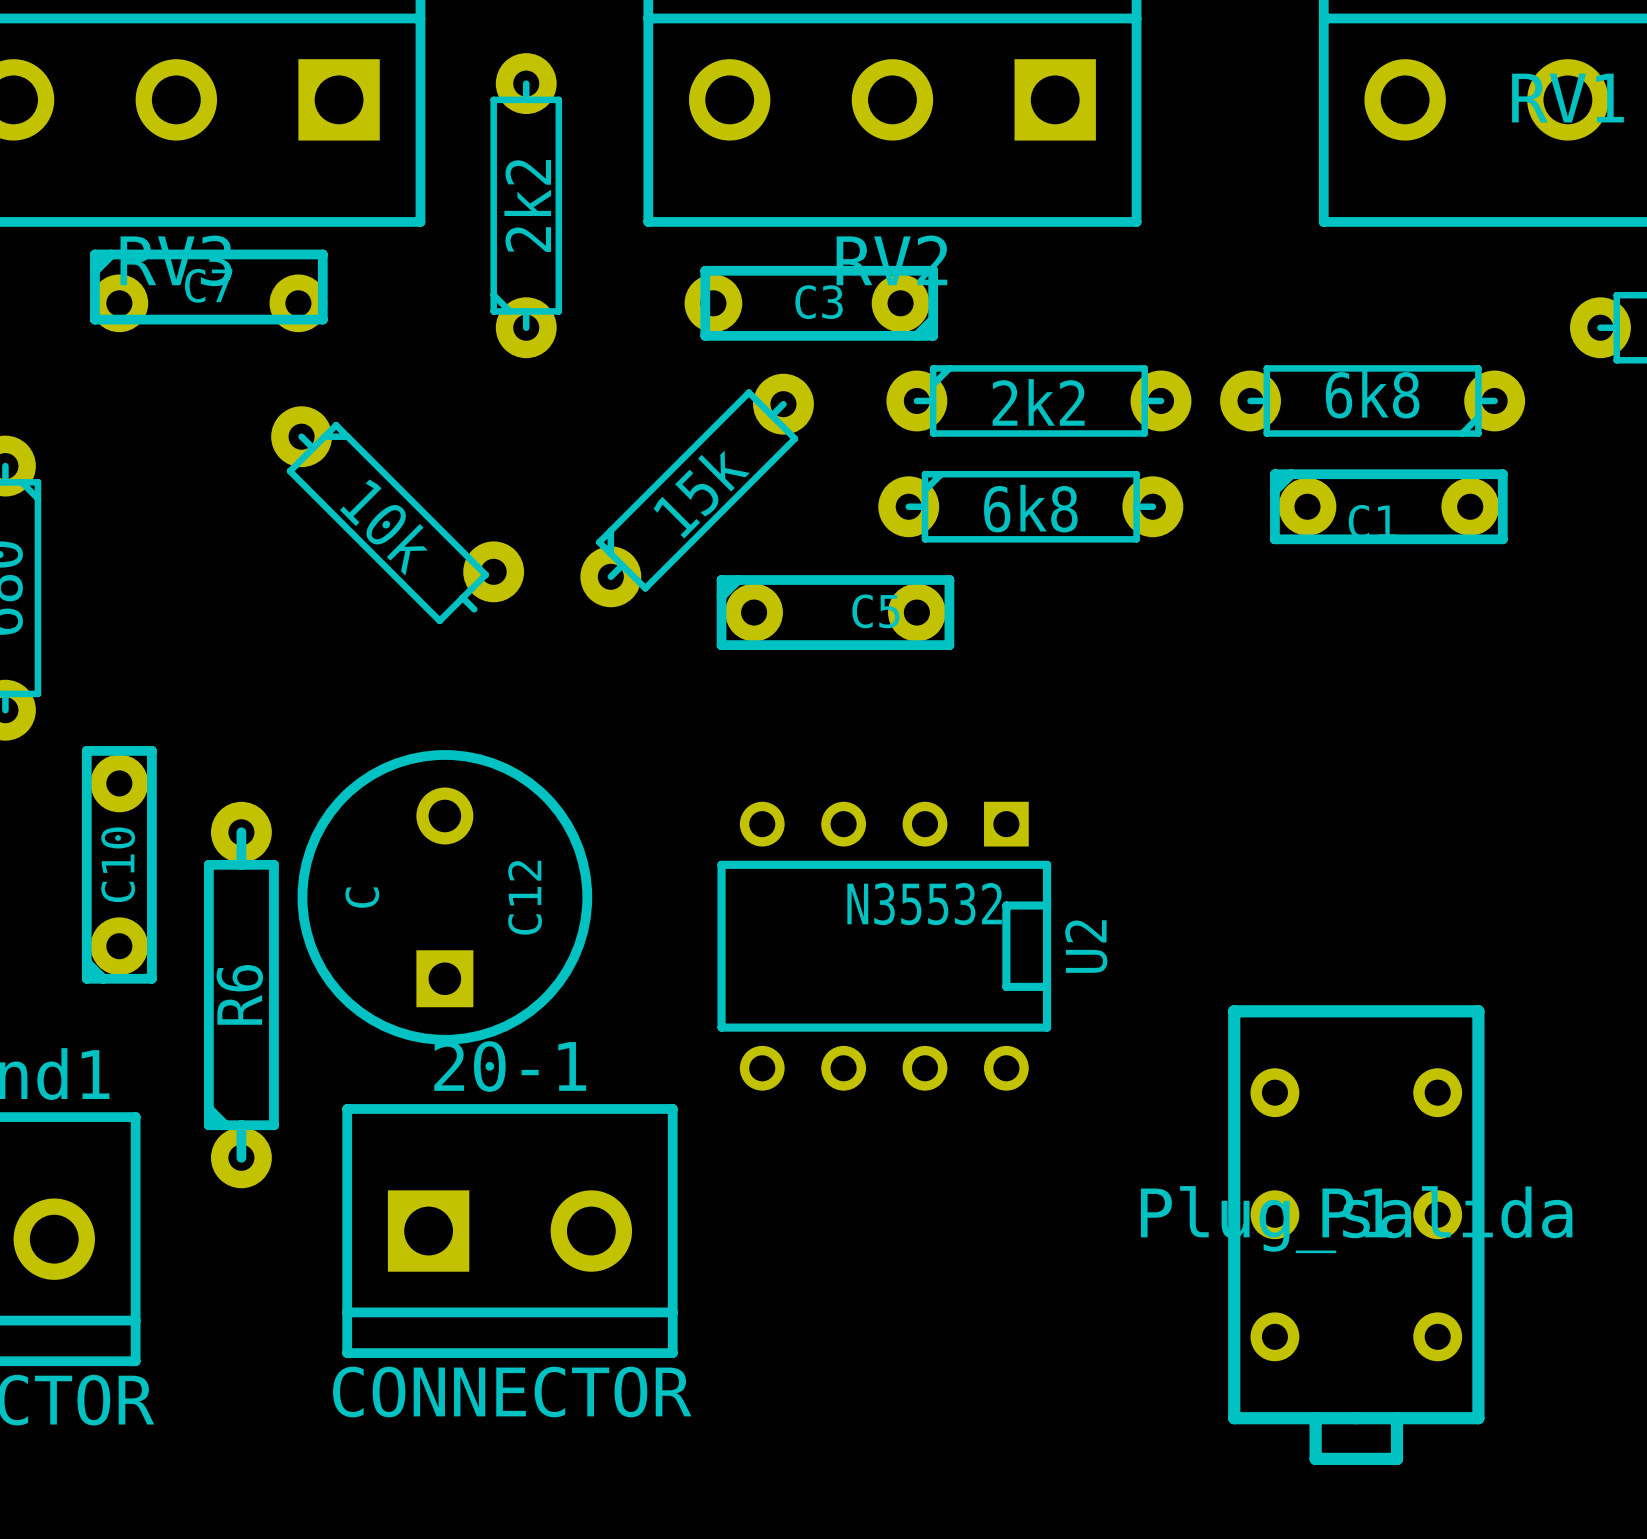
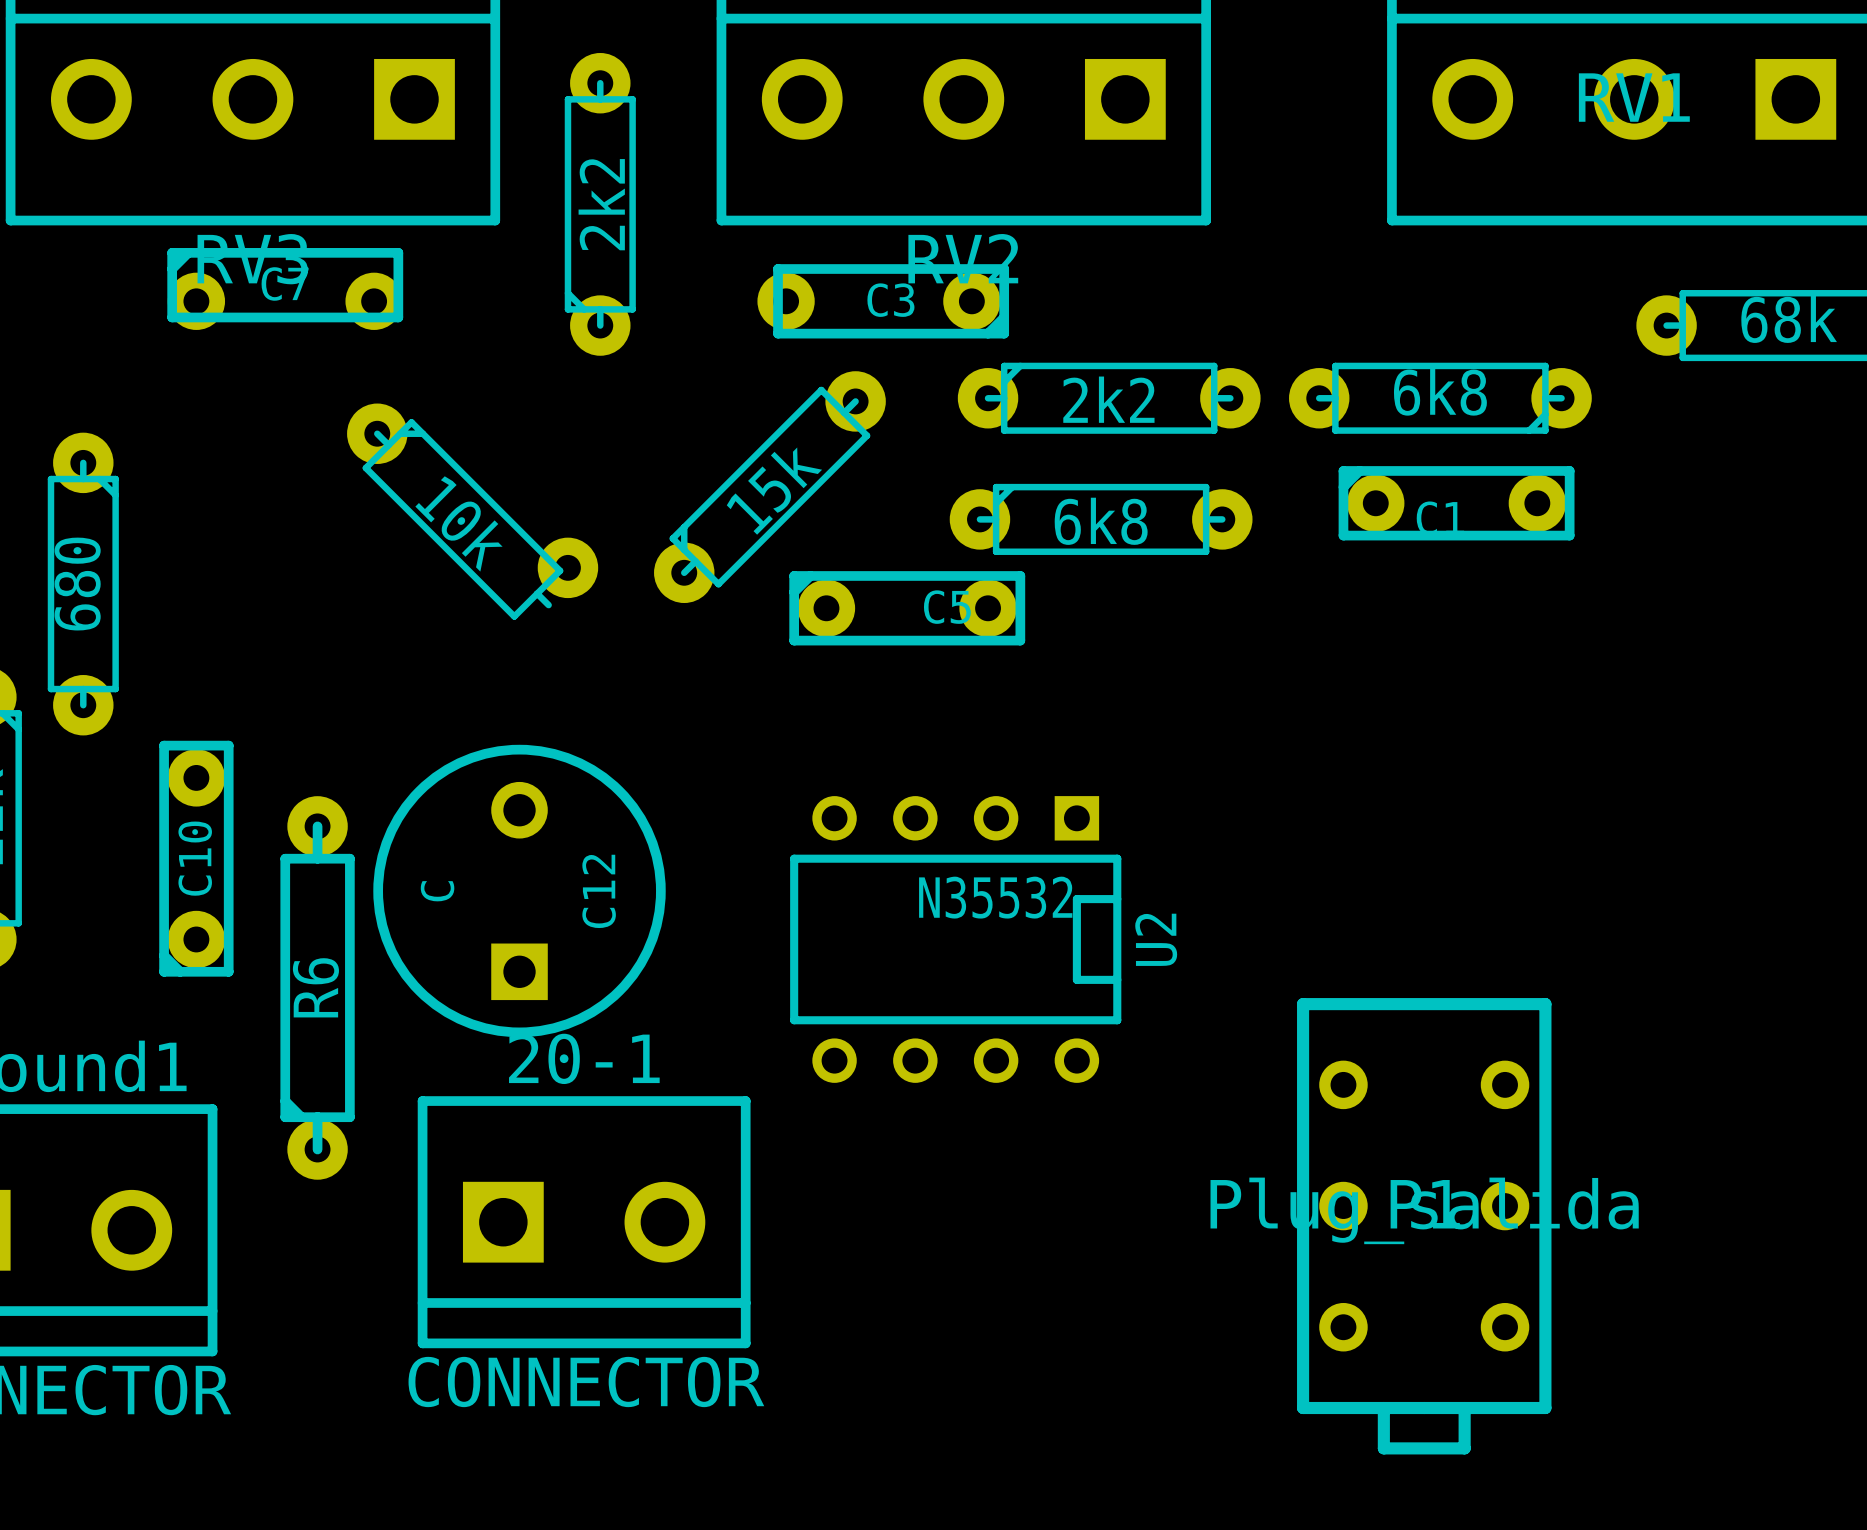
part position: (1030, 506) -> (1101, 519)

